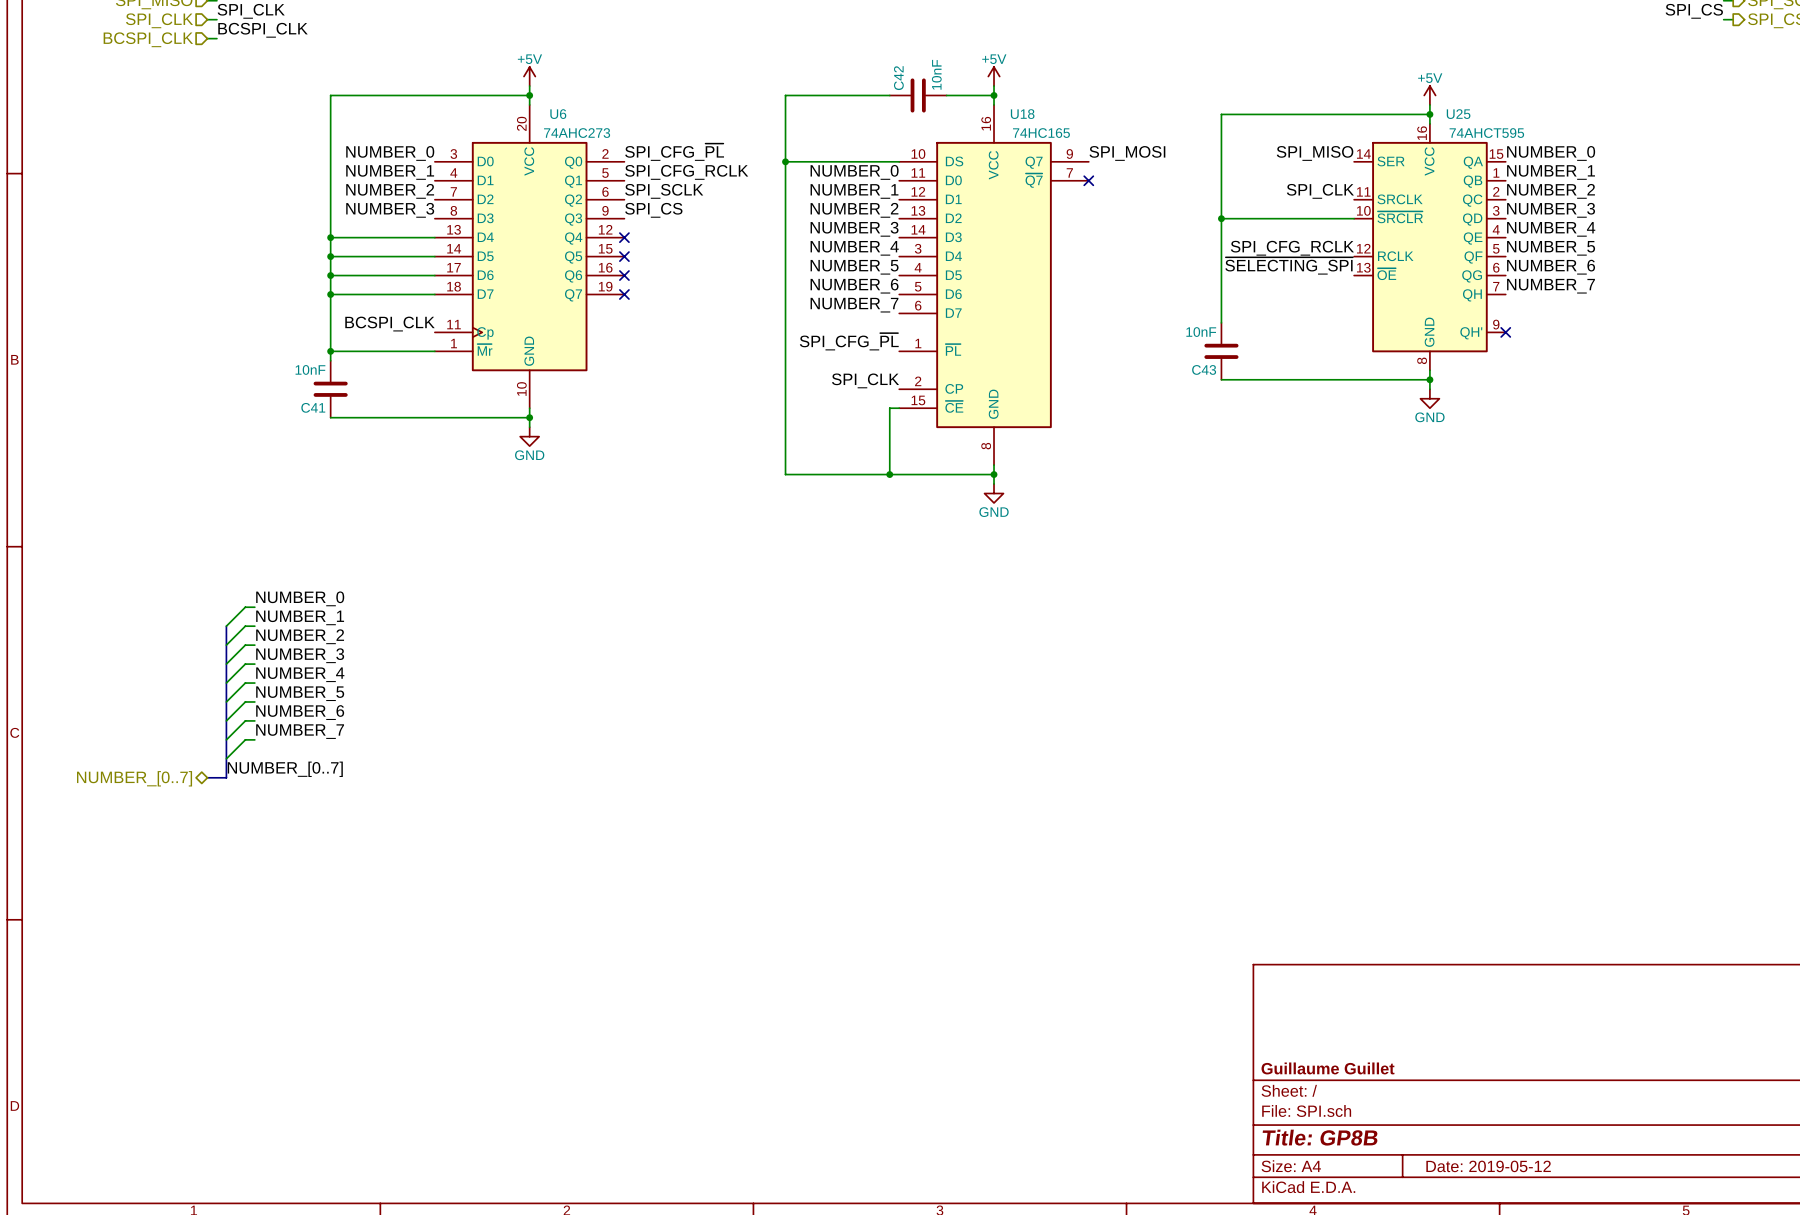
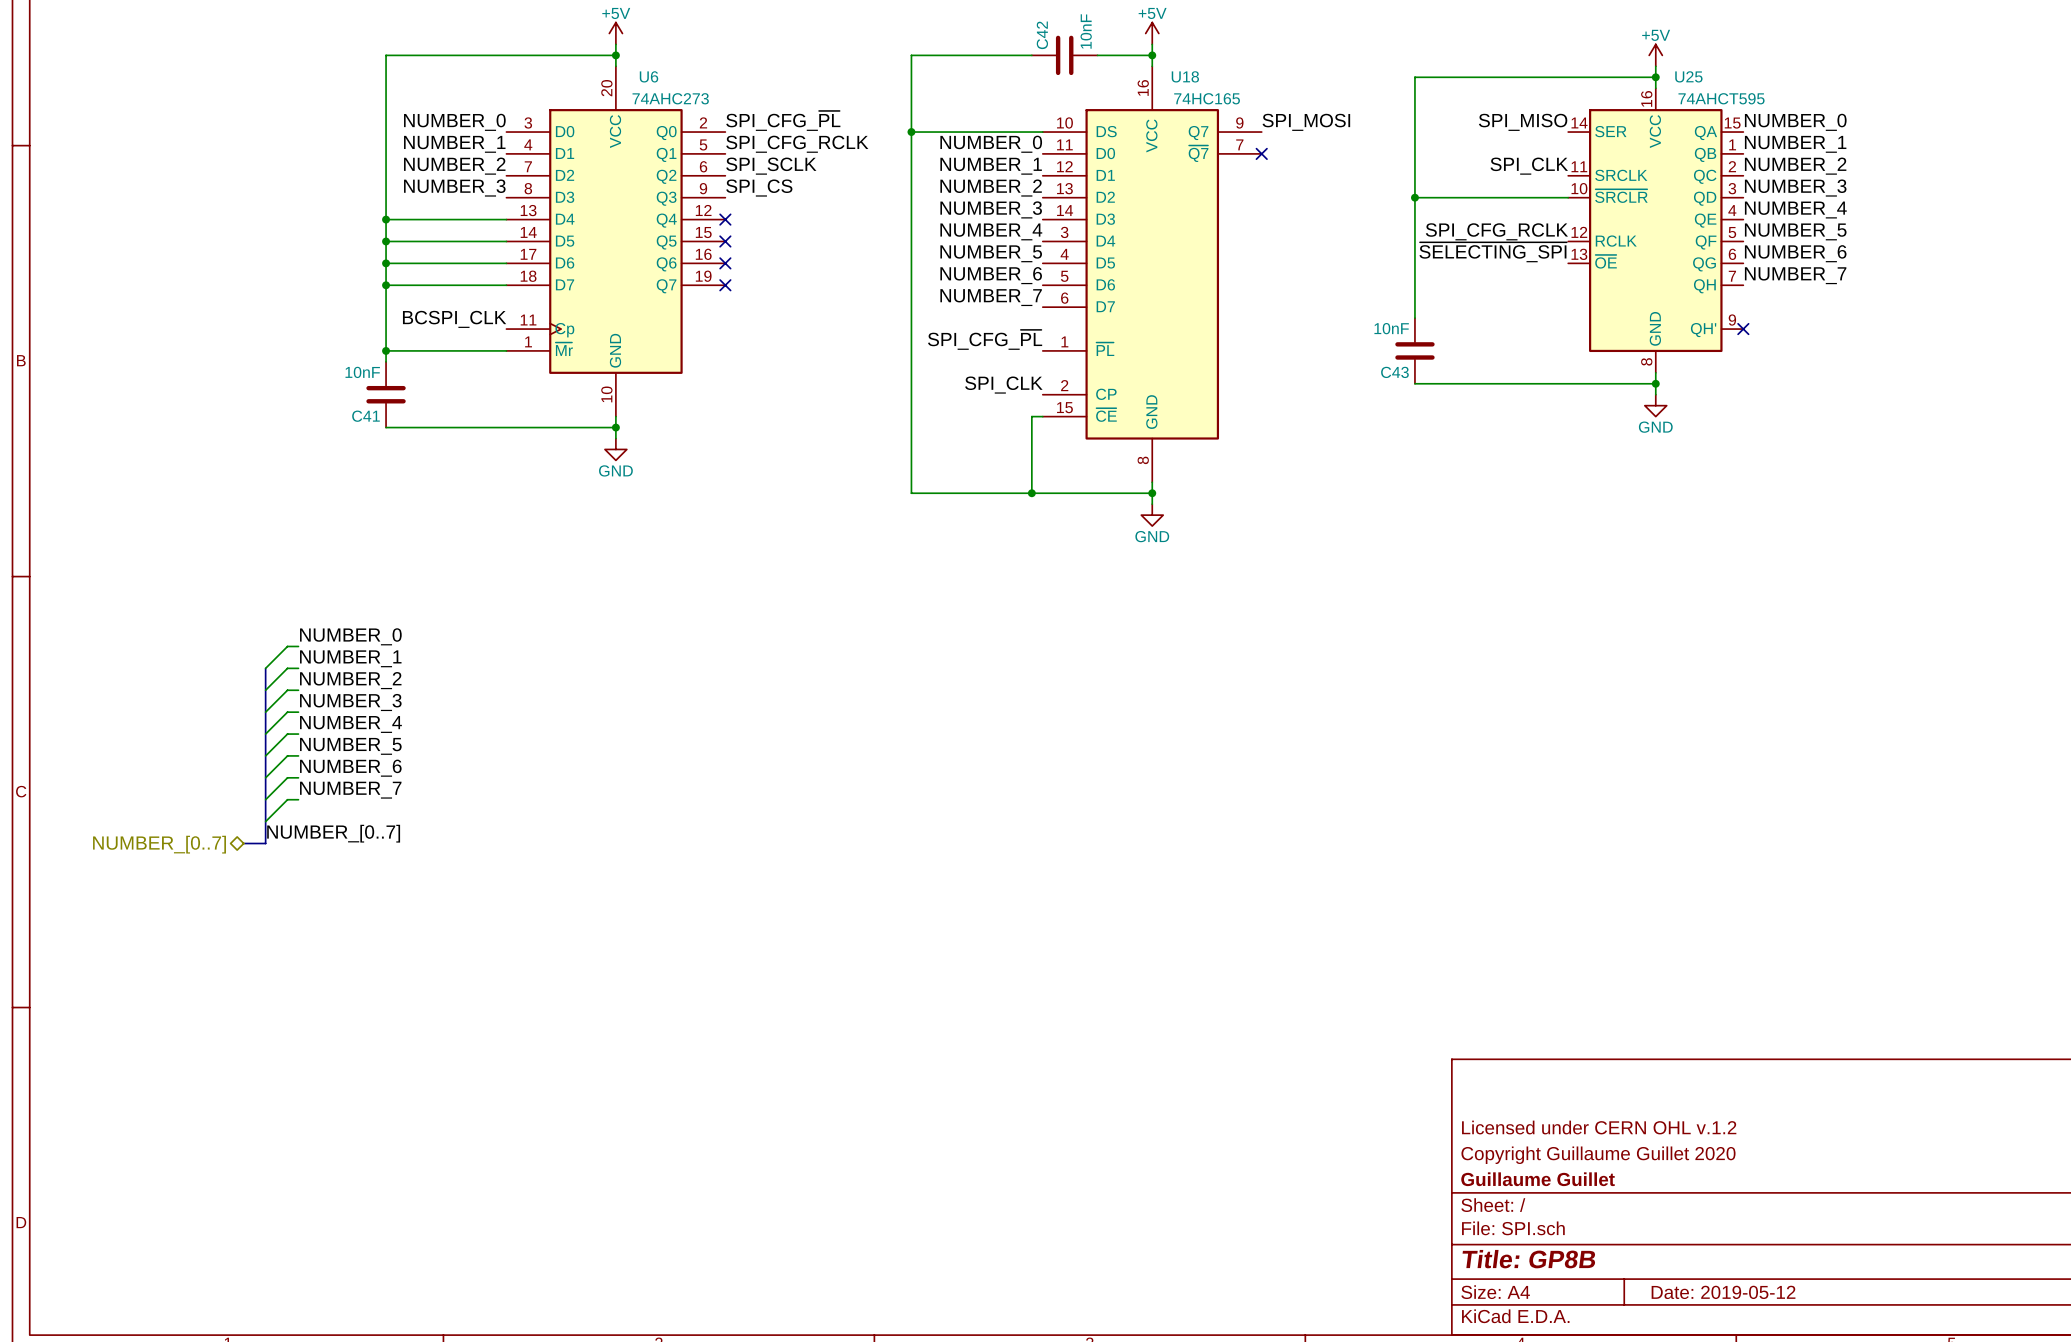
title block: none -> Licensed under CERN OHL v.1.2 (1599, 1127)
title block: none -> Copyright Guillaume Guillet 2020 (1598, 1155)

